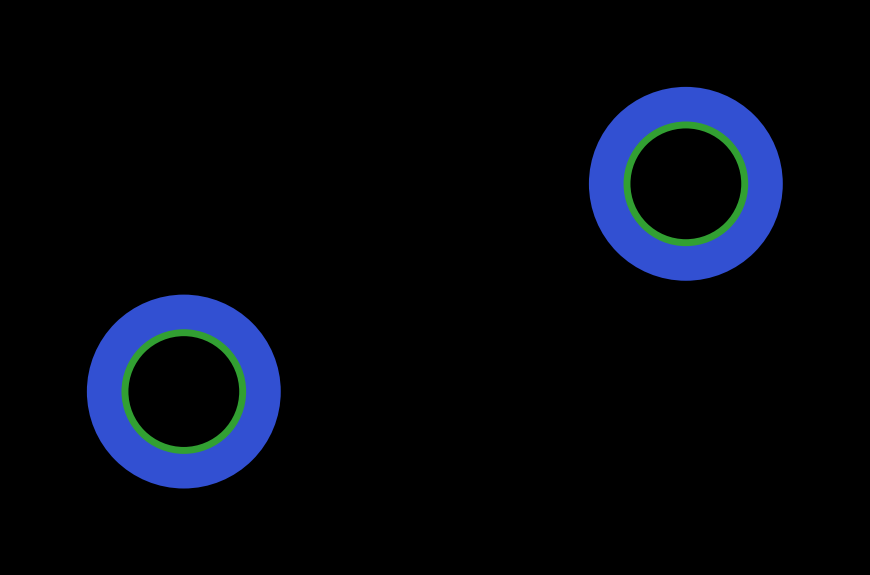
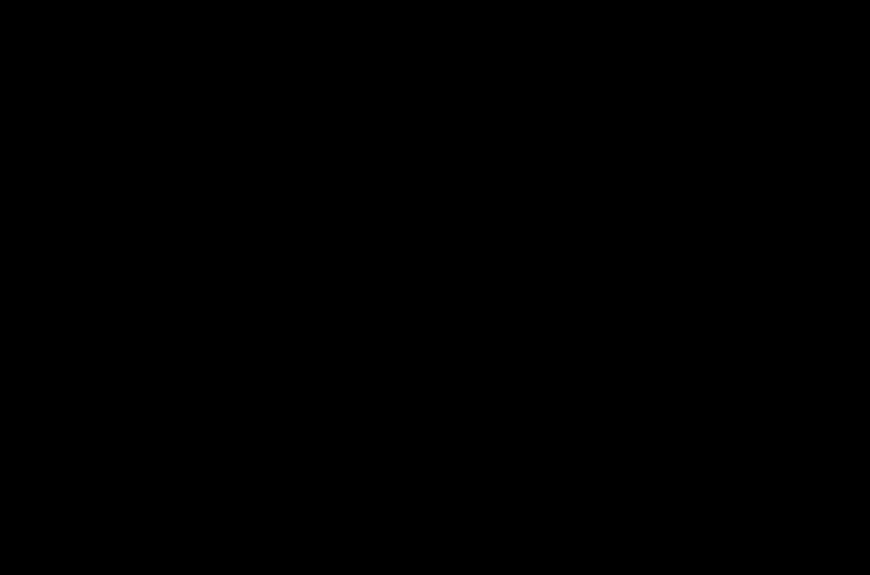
part: (685, 183) -> none
part: (183, 391) -> none

